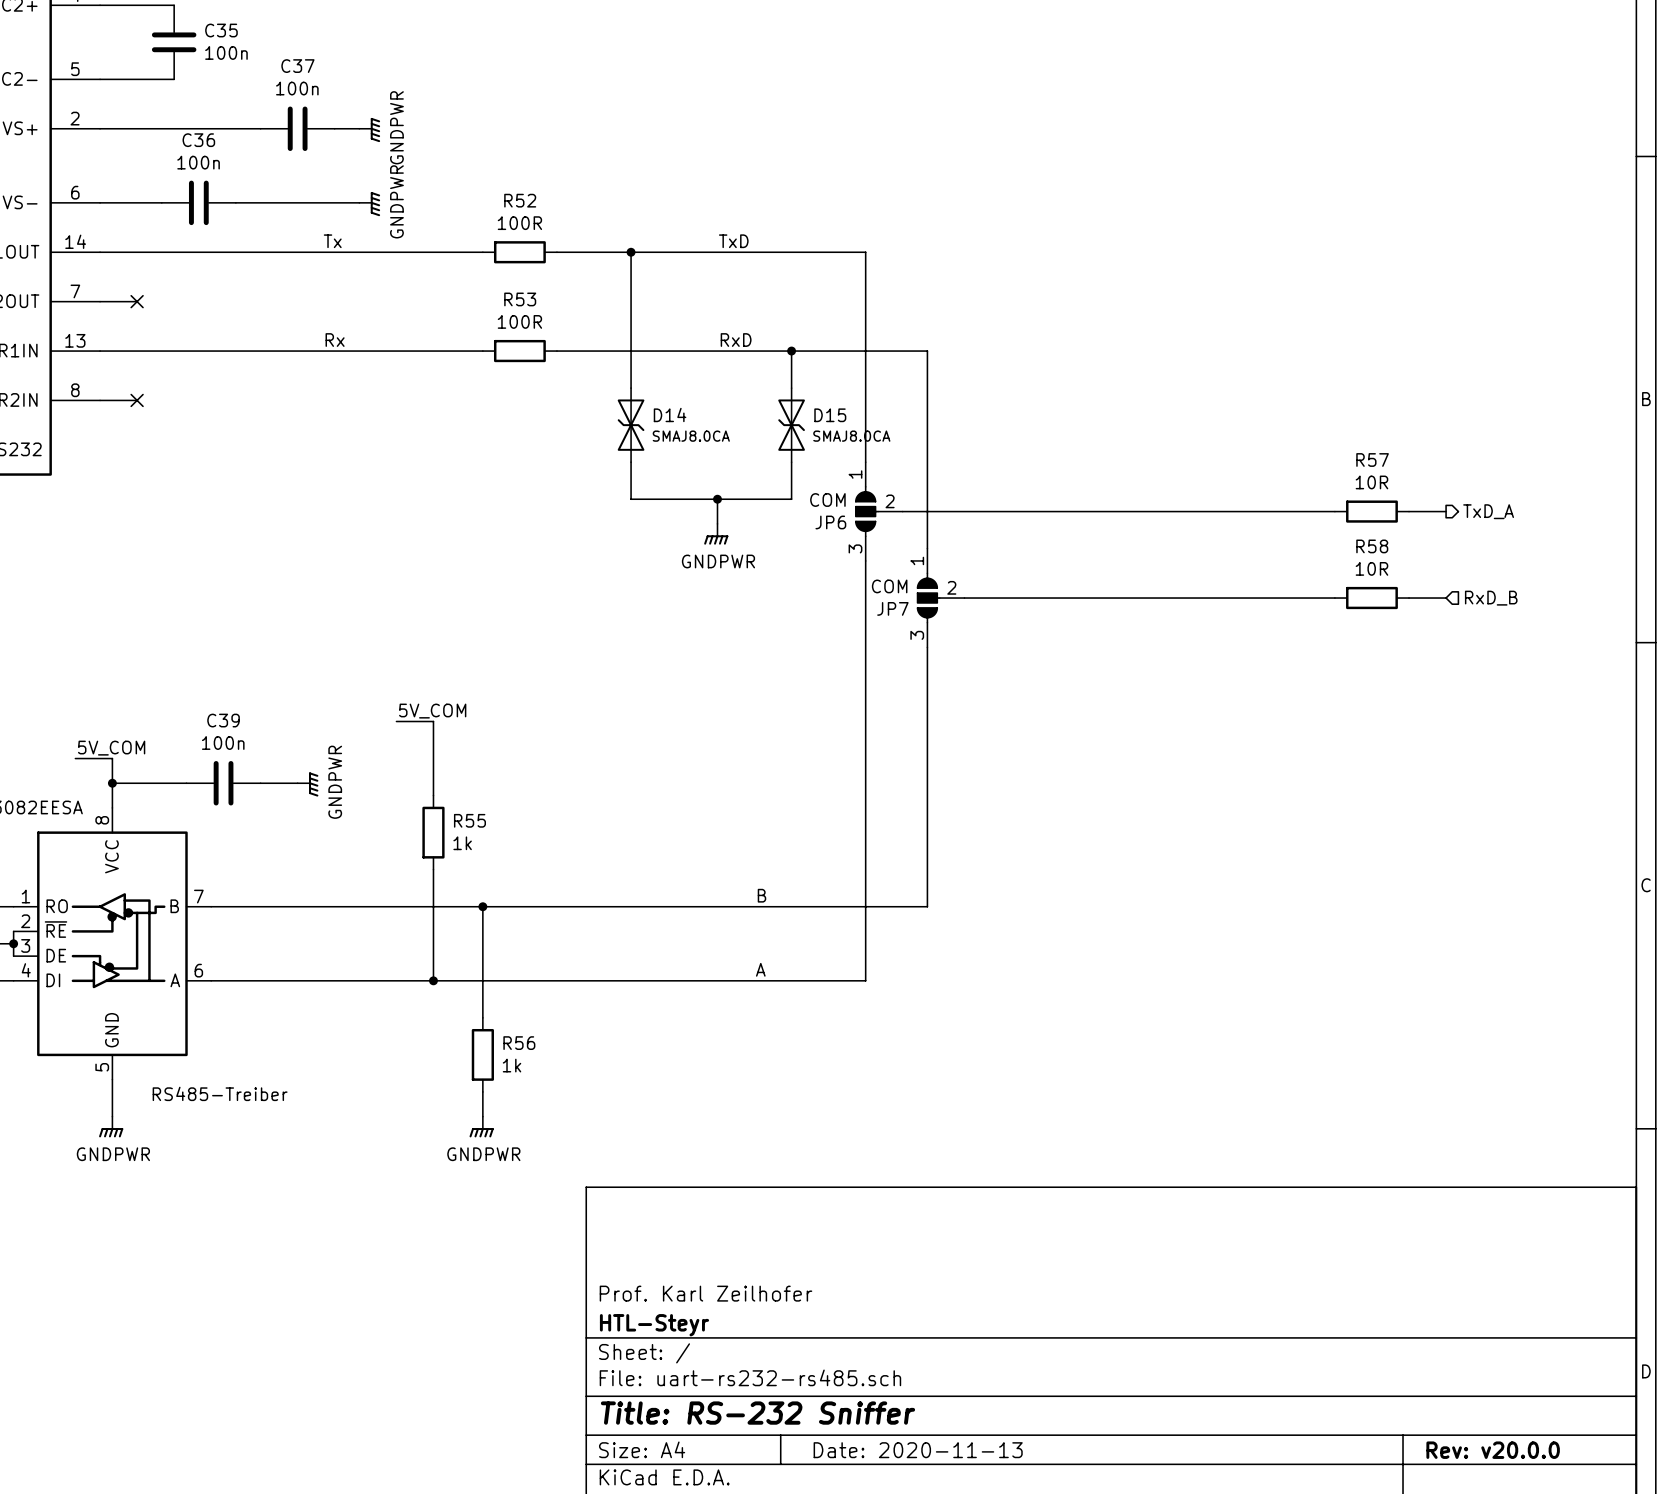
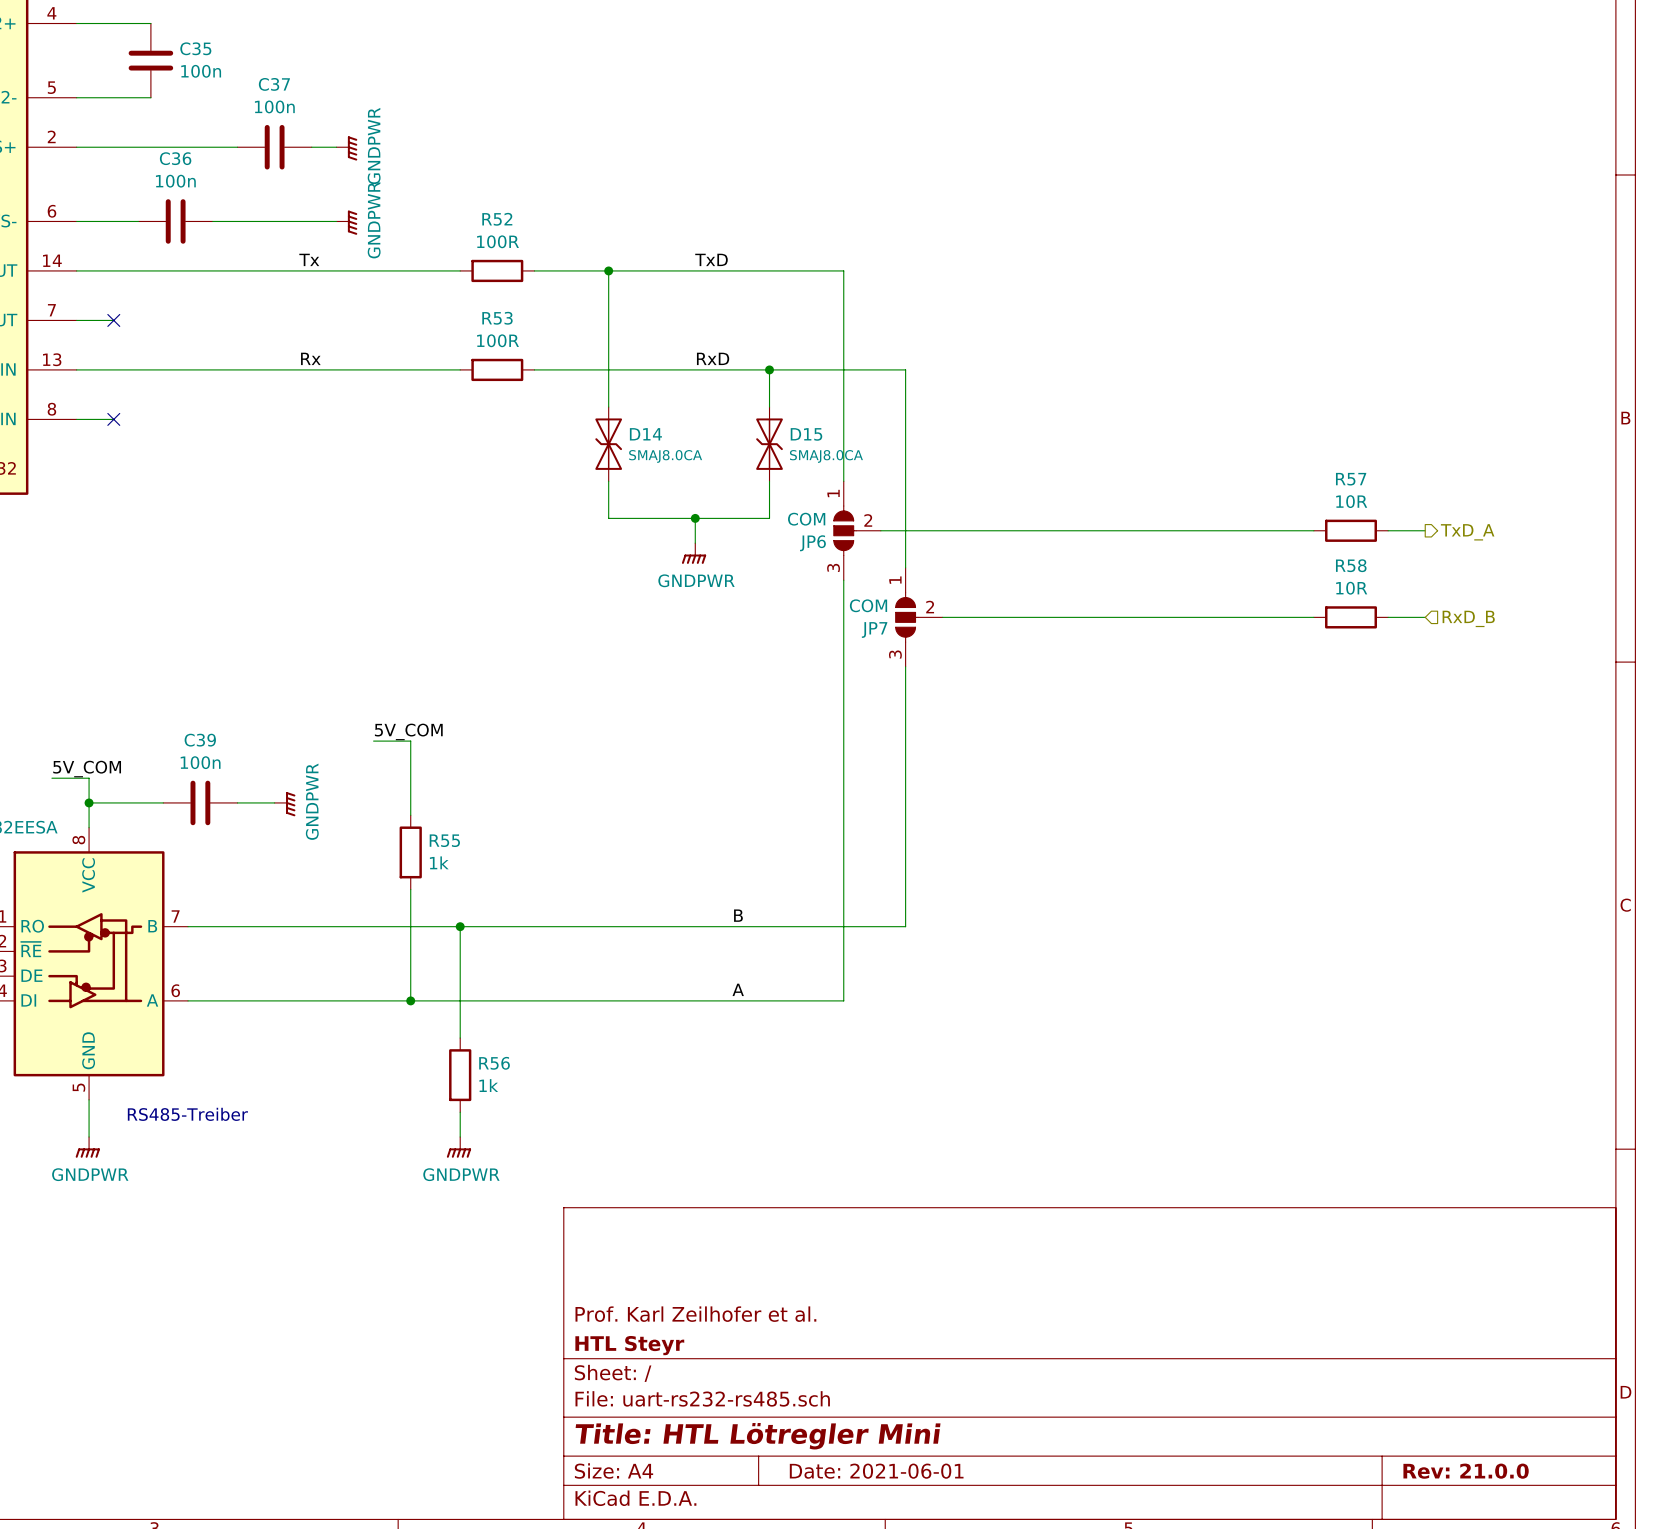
title block: Prof. Karl Zeilhofer (705, 1293) -> Prof. Karl Zeilhofer et al. (695, 1314)
title block: HTL-Steyr (654, 1325) -> HTL Steyr (629, 1345)
title block: Title: RS-232 Sniffer (757, 1413) -> Title: HTL Lötregler Mini (758, 1436)
title block: Date: 2020-11-13 (918, 1450) -> Date: 2021-06-01 (876, 1471)
title block: Rev: v20.0.0 (1493, 1450) -> Rev: 21.0.0 (1466, 1471)

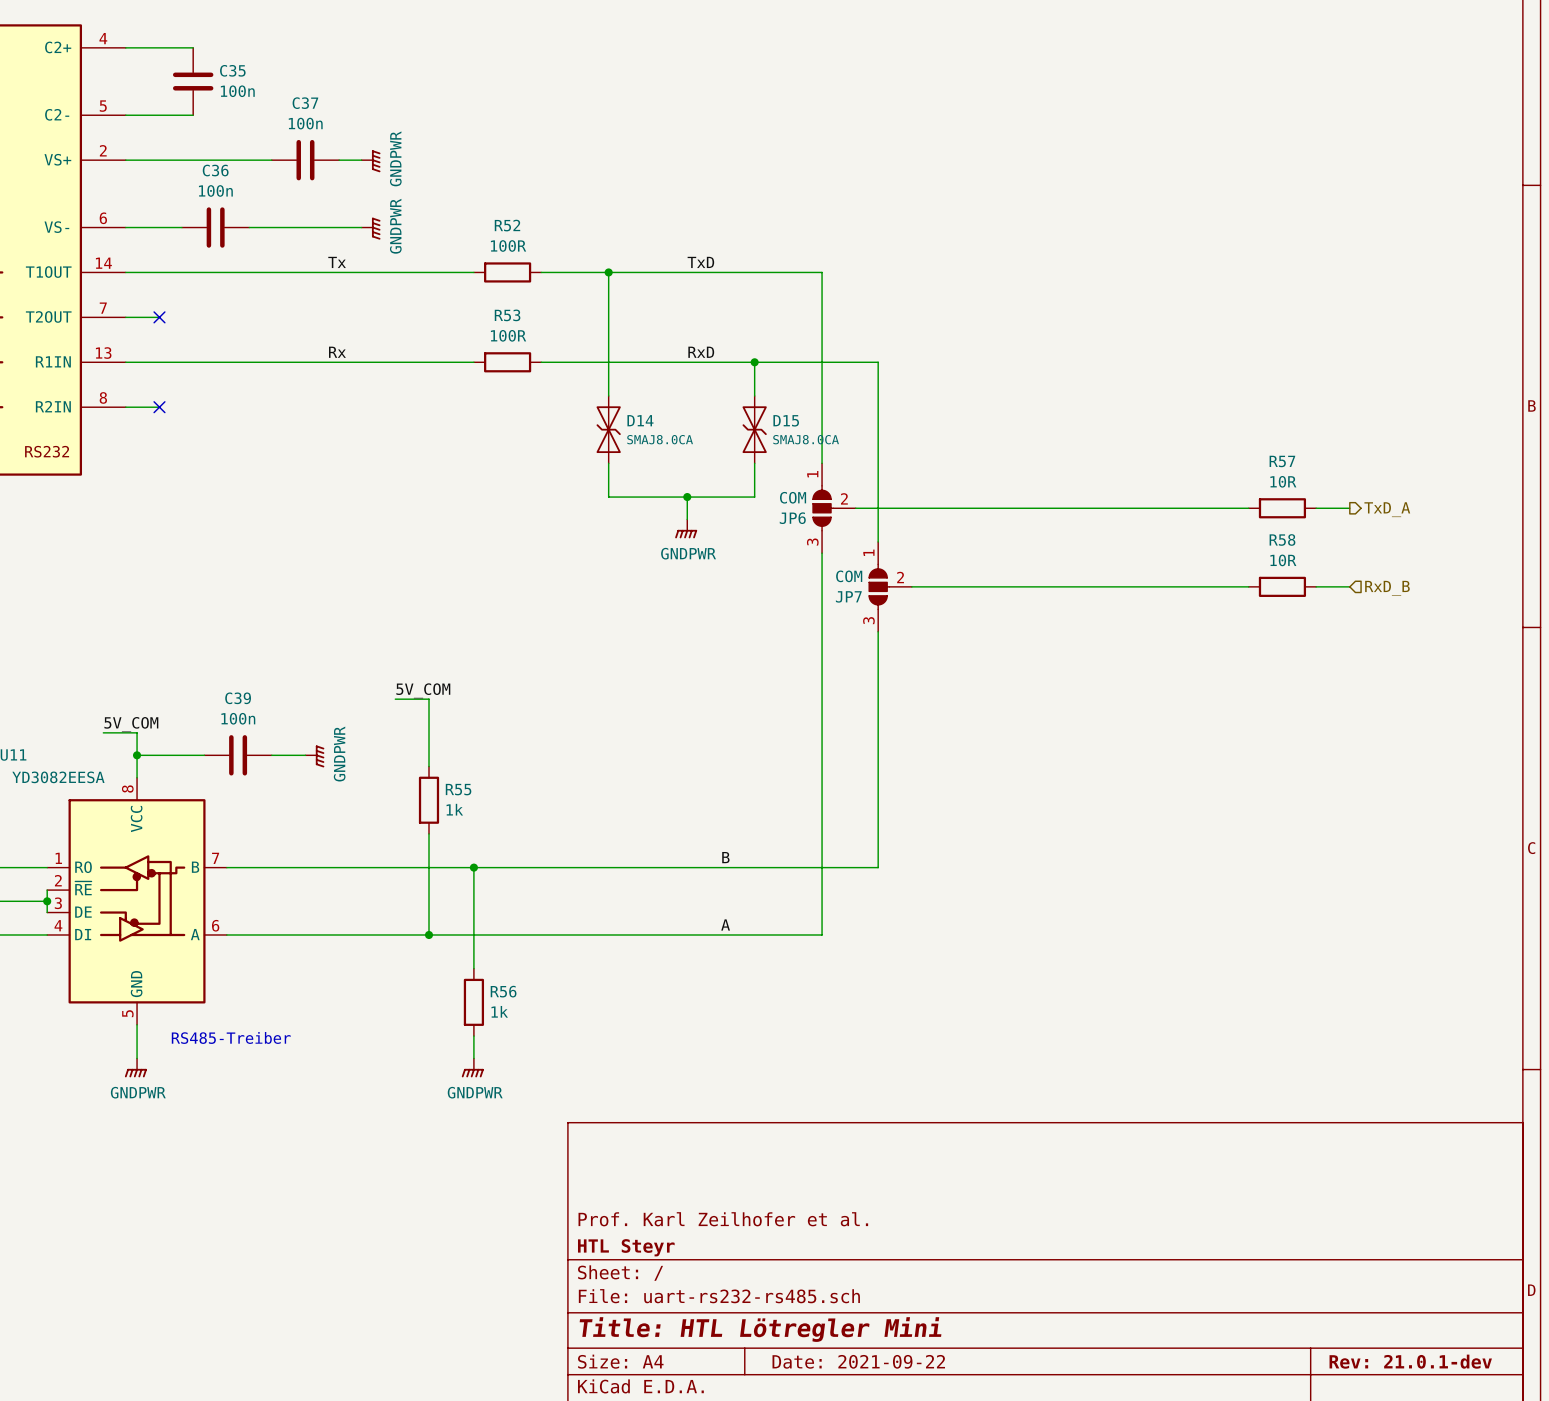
title block: Date: 2021-06-01 (876, 1471) -> Date: 2021-09-22 (858, 1361)
title block: Rev: 21.0.0 (1466, 1471) -> Rev: 21.0.1-dev (1410, 1361)

